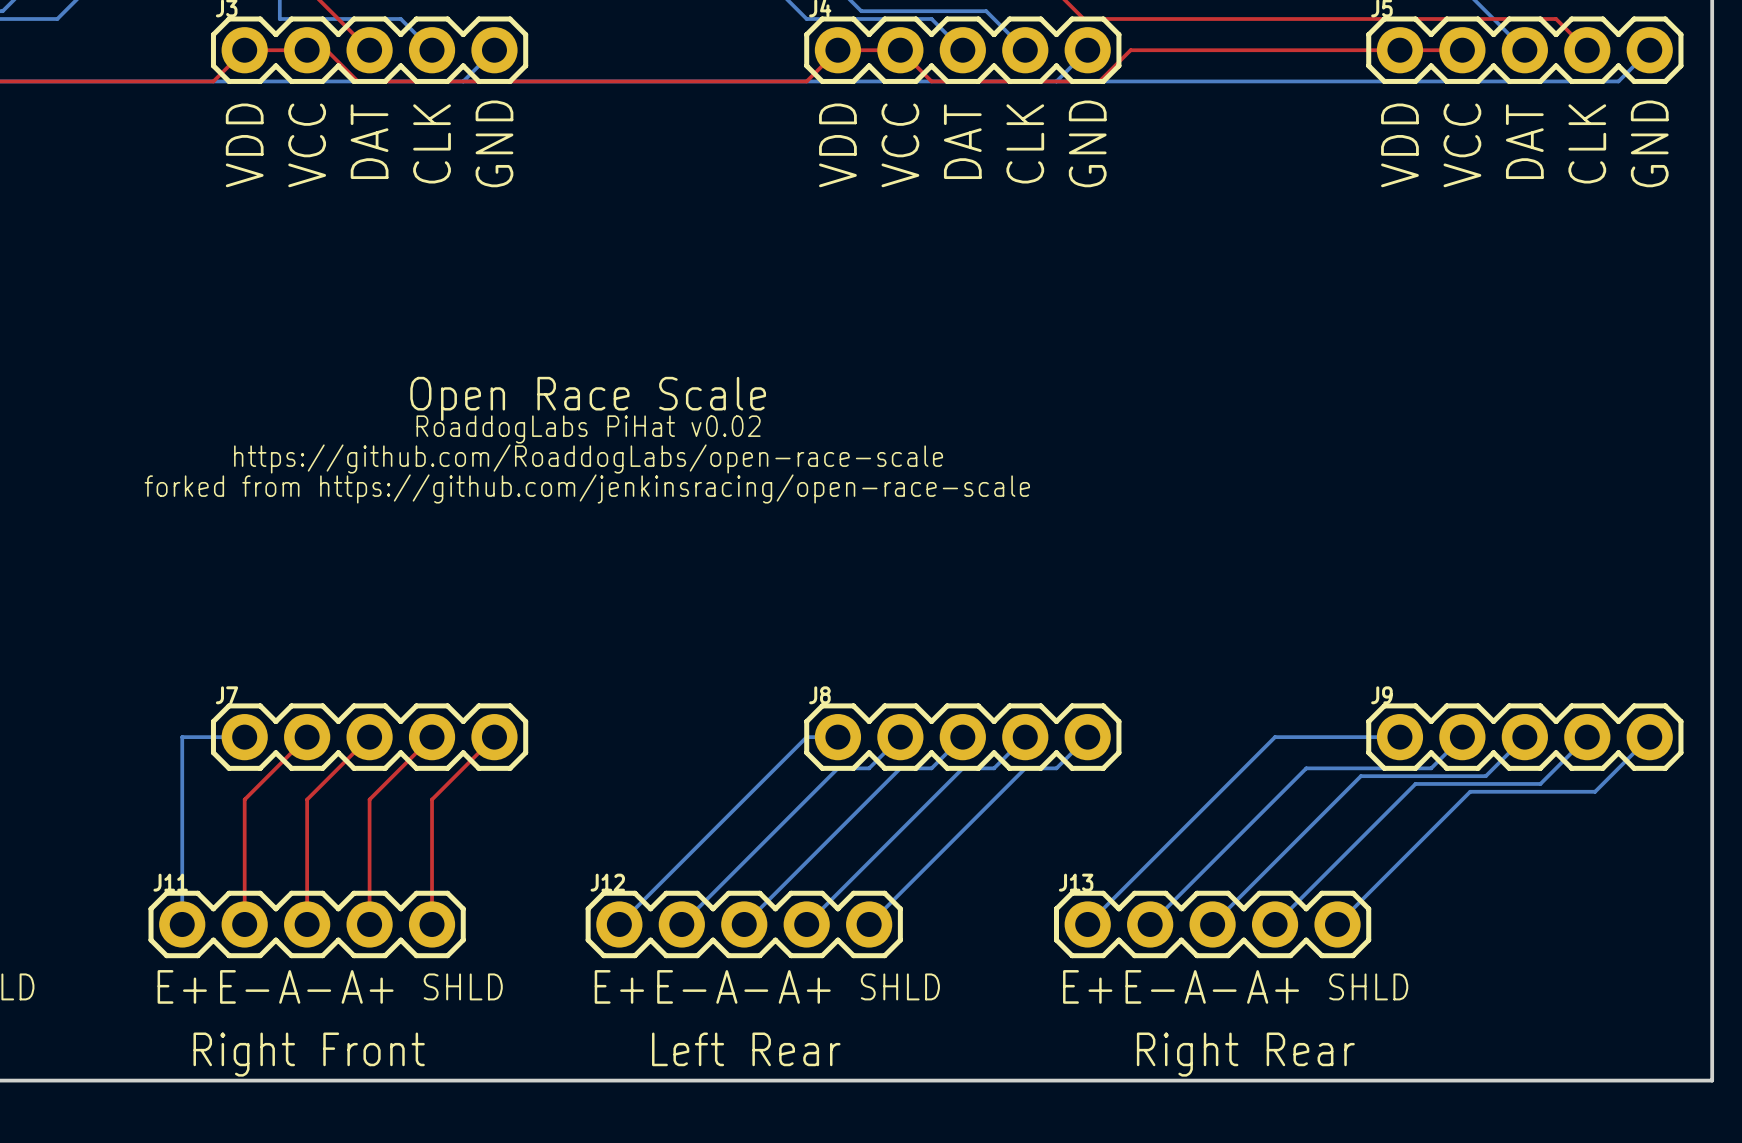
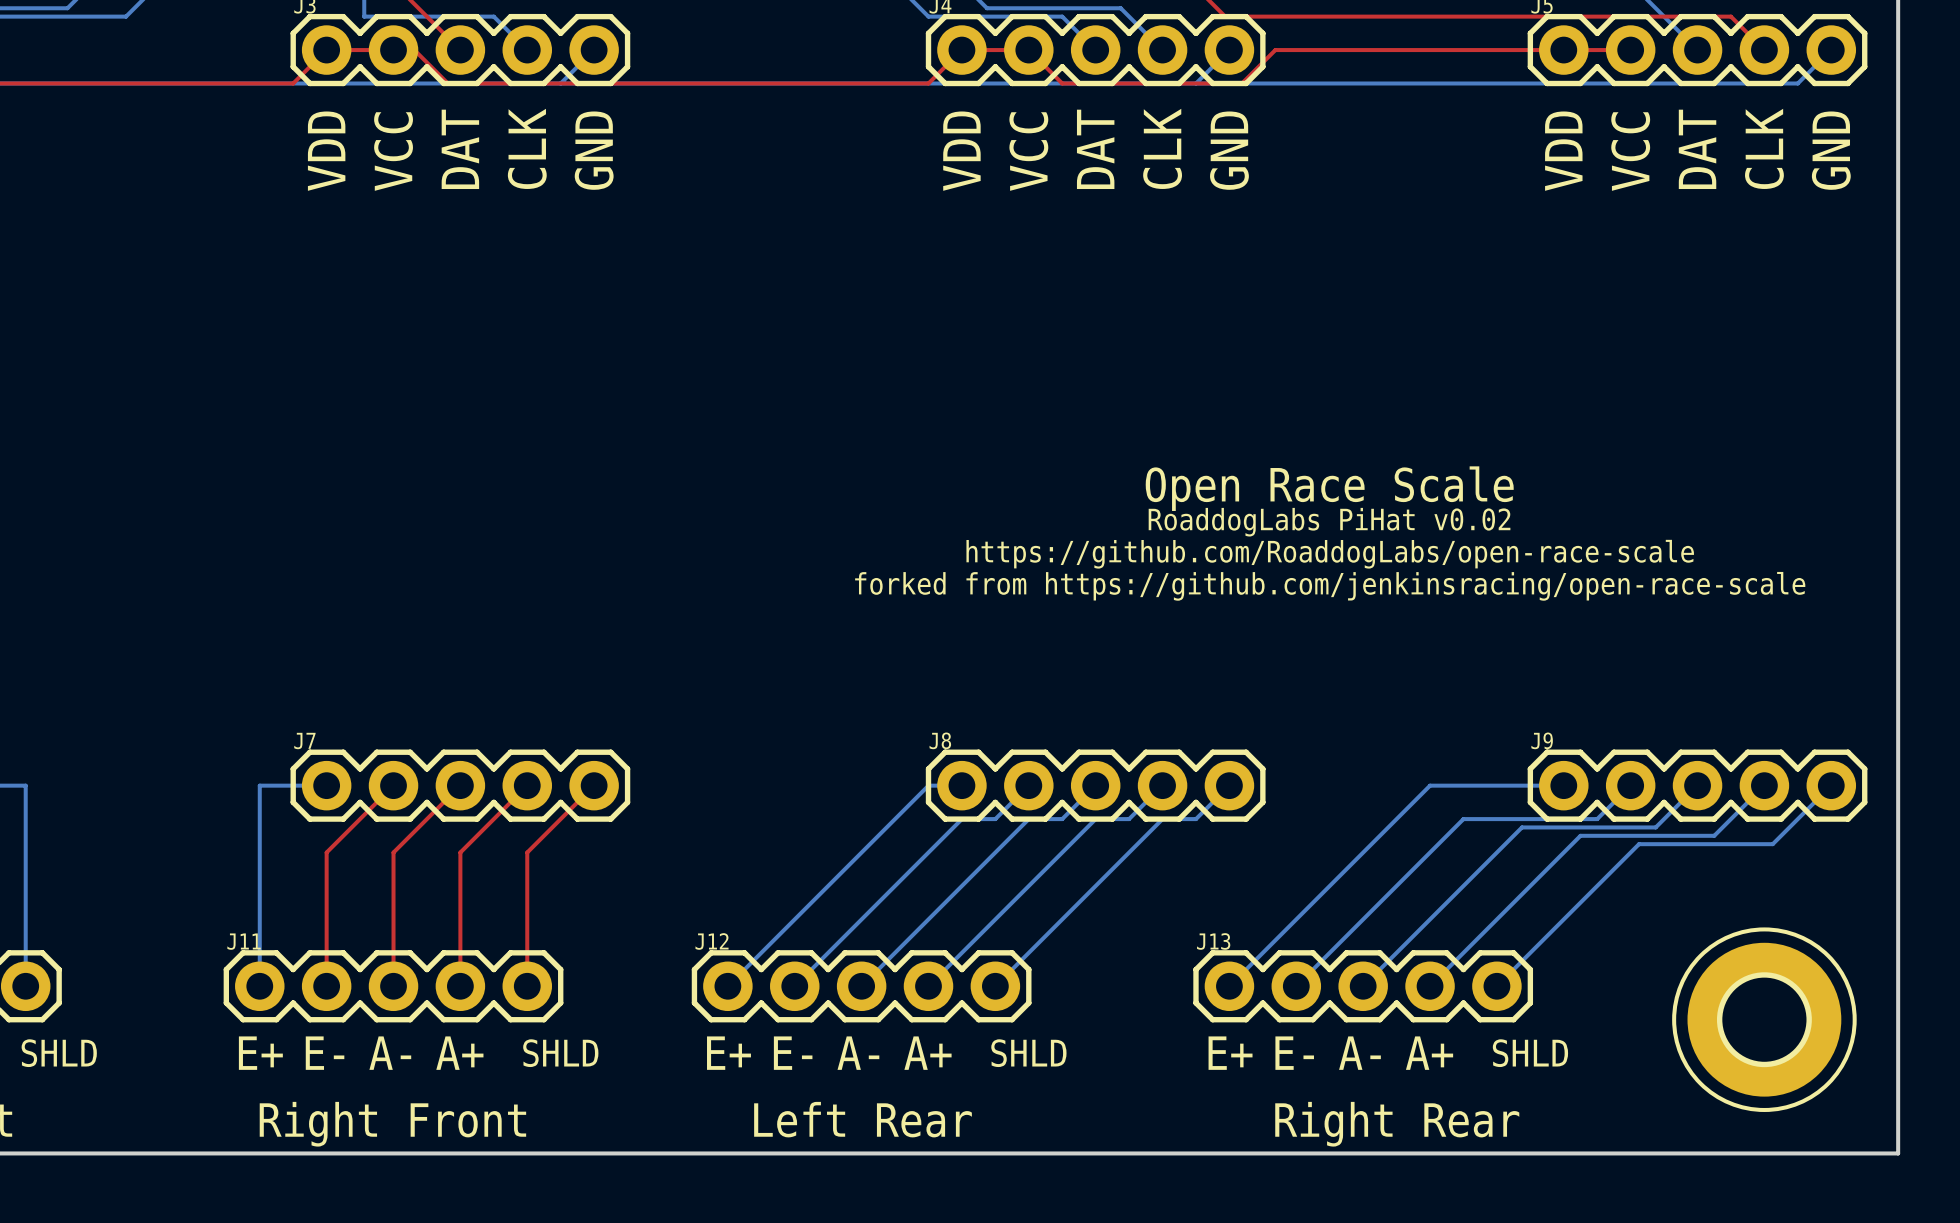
text position: Open Race Scale (588, 398) -> Open Race Scale (1329, 488)
text position: RoaddogLabs PiHat v0.02 (588, 429) -> RoaddogLabs PiHat v0.02 (1329, 522)
text position: https://github.com/RoaddogLabs/open-race-scale (588, 458) -> https://github.com/RoaddogLabs/open-race-scale (1330, 554)
text position: forked from https://github.com/jenkinsracing/open-race-scale (587, 488) -> forked from https://github.com/jenkinsracing/open-race-scale (1330, 586)
part: none -> (1764, 1019)

